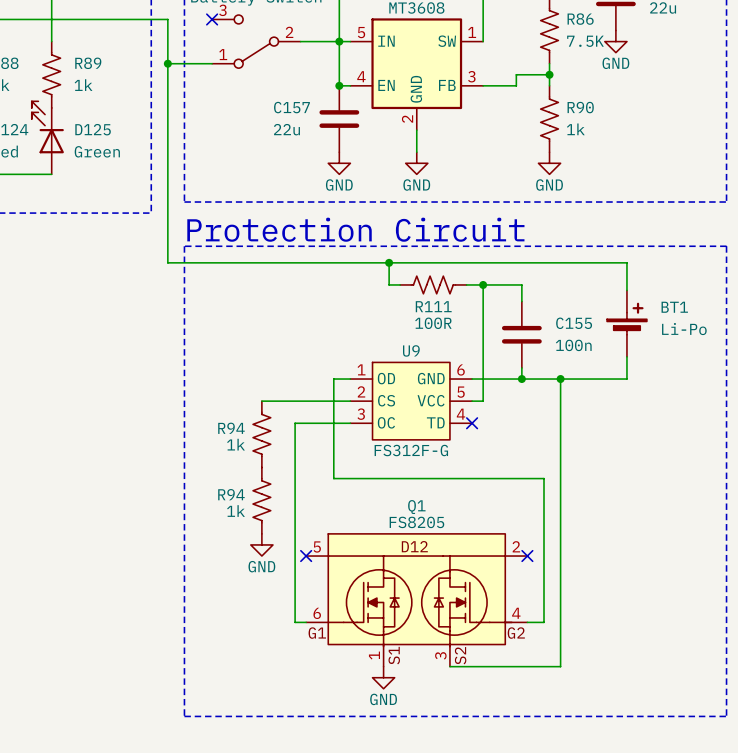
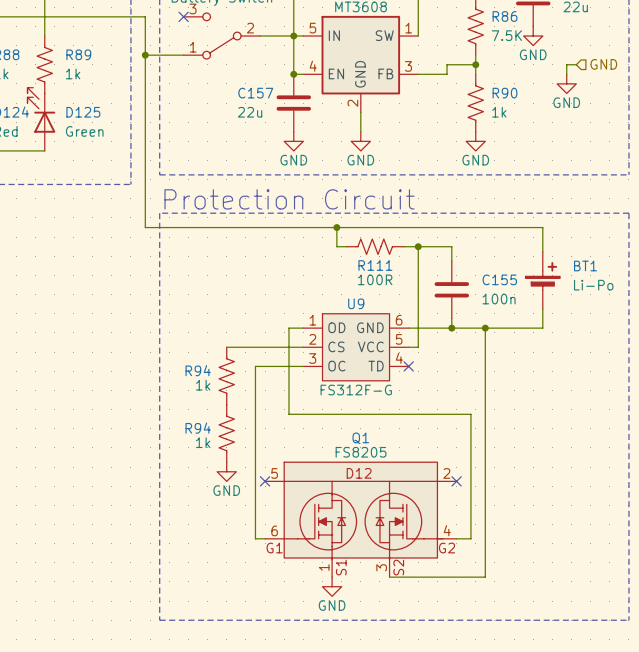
wire: none -> (576, 64) (566, 64) (566, 74)
hierarchical label: none -> GND (603, 64)
power symbol: none -> GND (566, 83)

